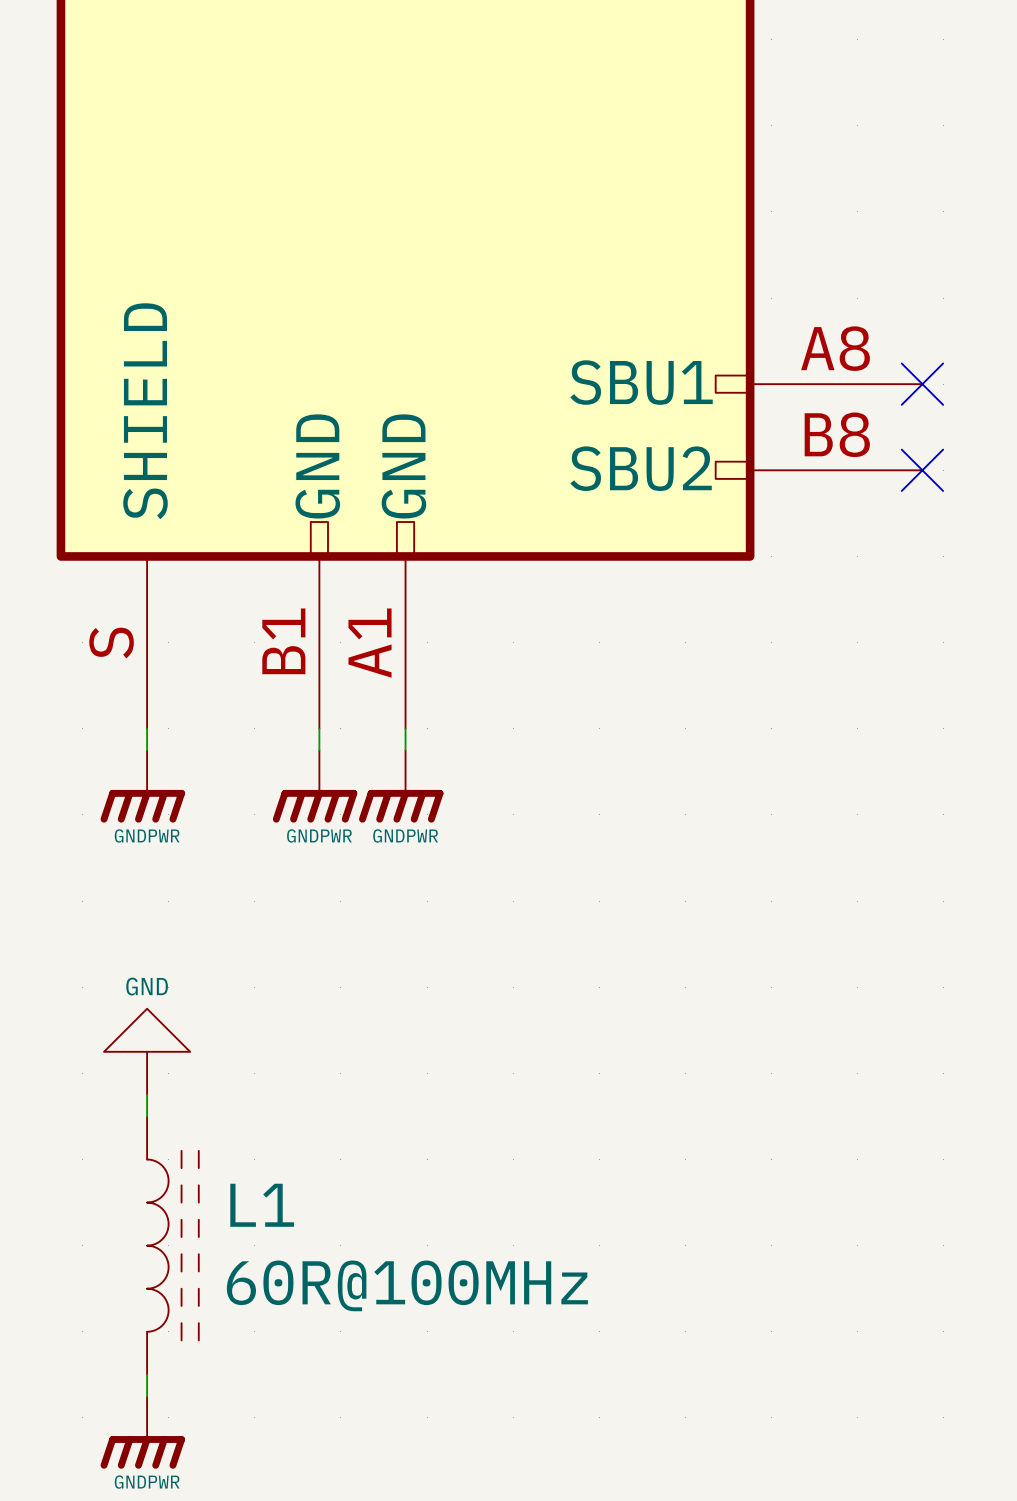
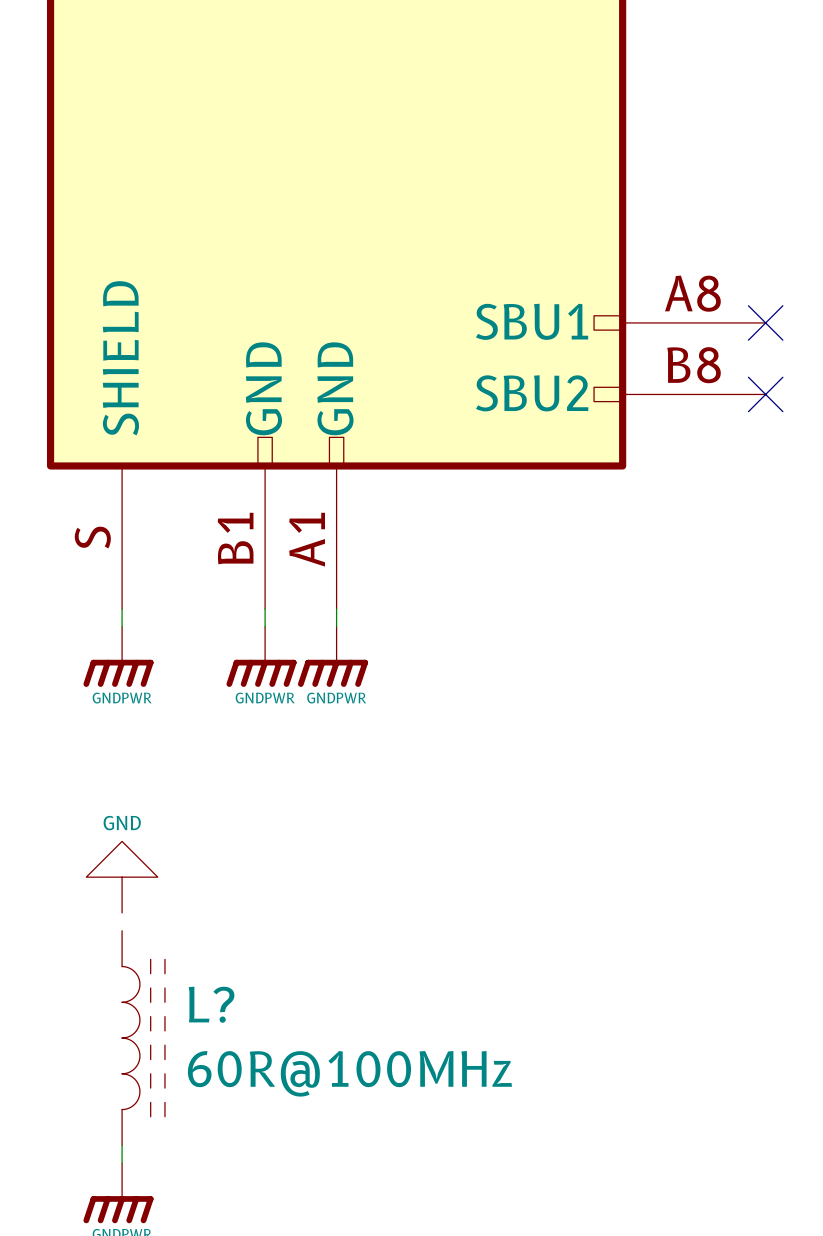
wire: (147, 1094) (147, 1116) -> none
L1 name: L1 (262, 1205) -> L? (211, 1004)

